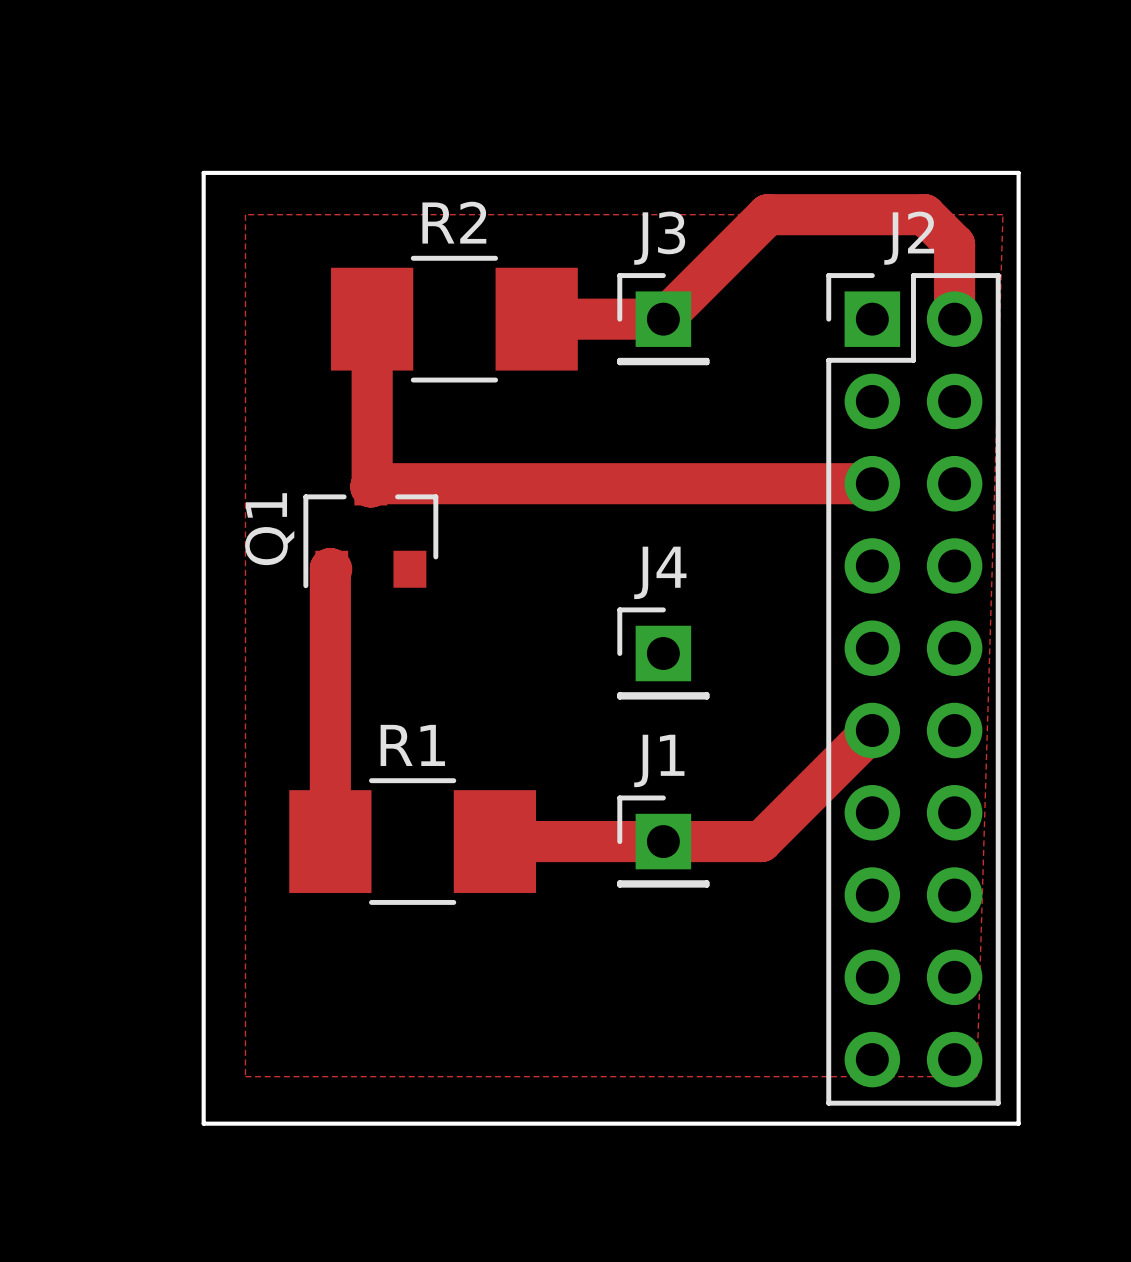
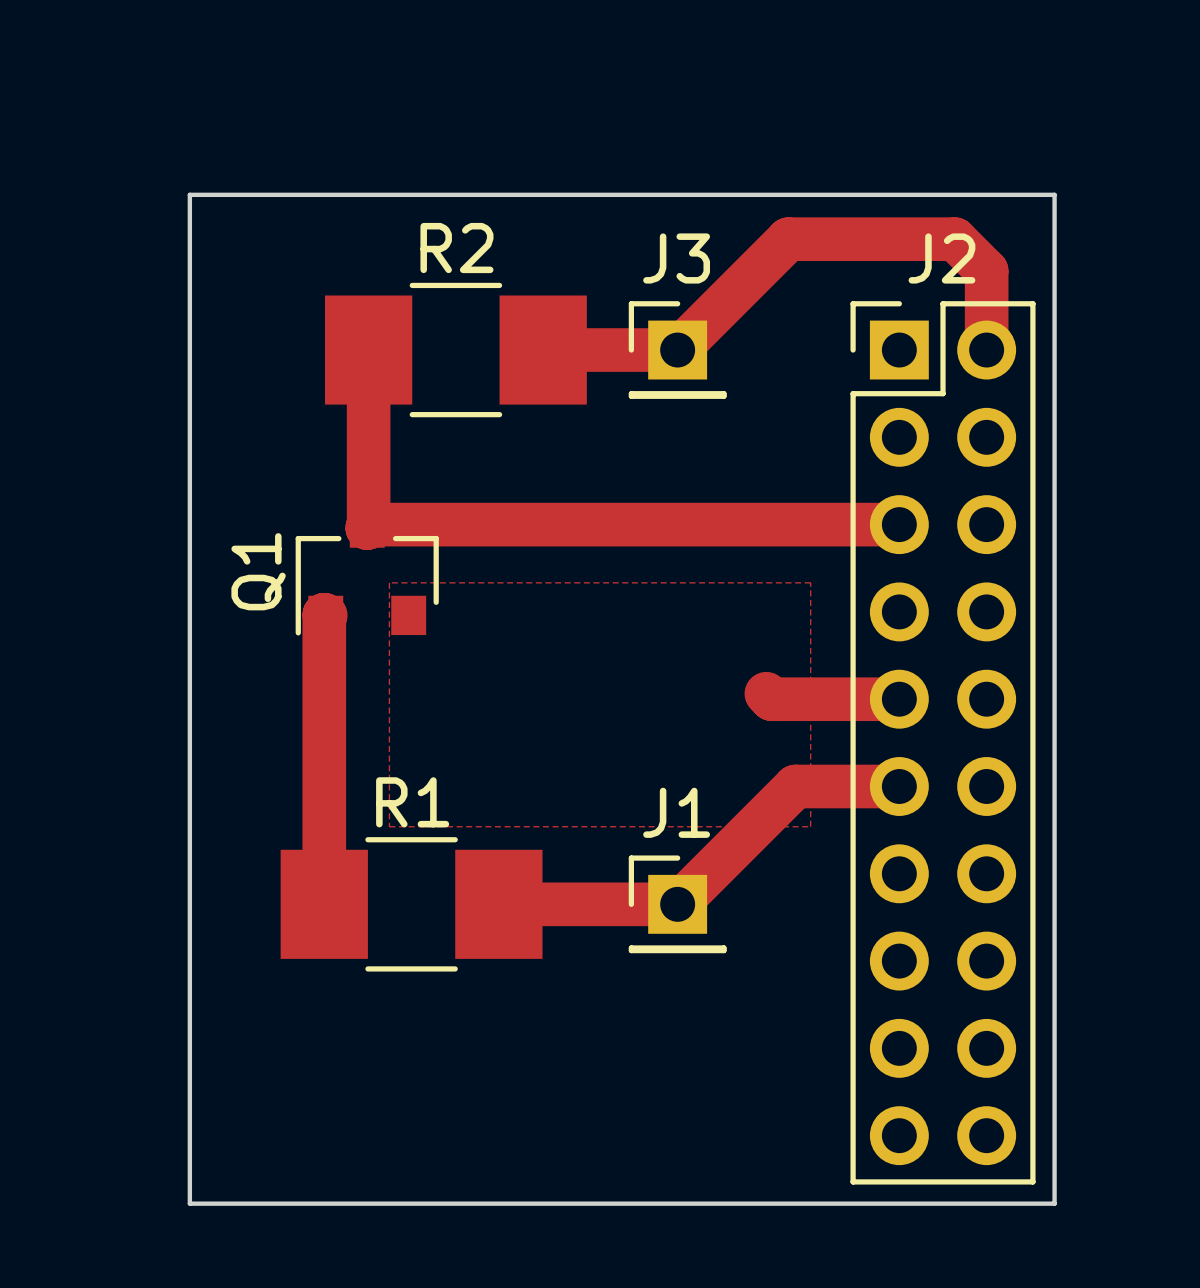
zone outline: (245, 214) (245, 1076) (976, 1076) (1002, 214) (245, 214) -> none
zone outline: none -> (389, 582) (389, 826) (810, 826) (810, 582) (389, 582)
track: none -> (766, 693) (771, 699) (899, 699)
J4: (663, 653) -> none
track: (872, 730) (761, 841) (663, 841) -> (899, 786) (795, 786) (677, 904)

